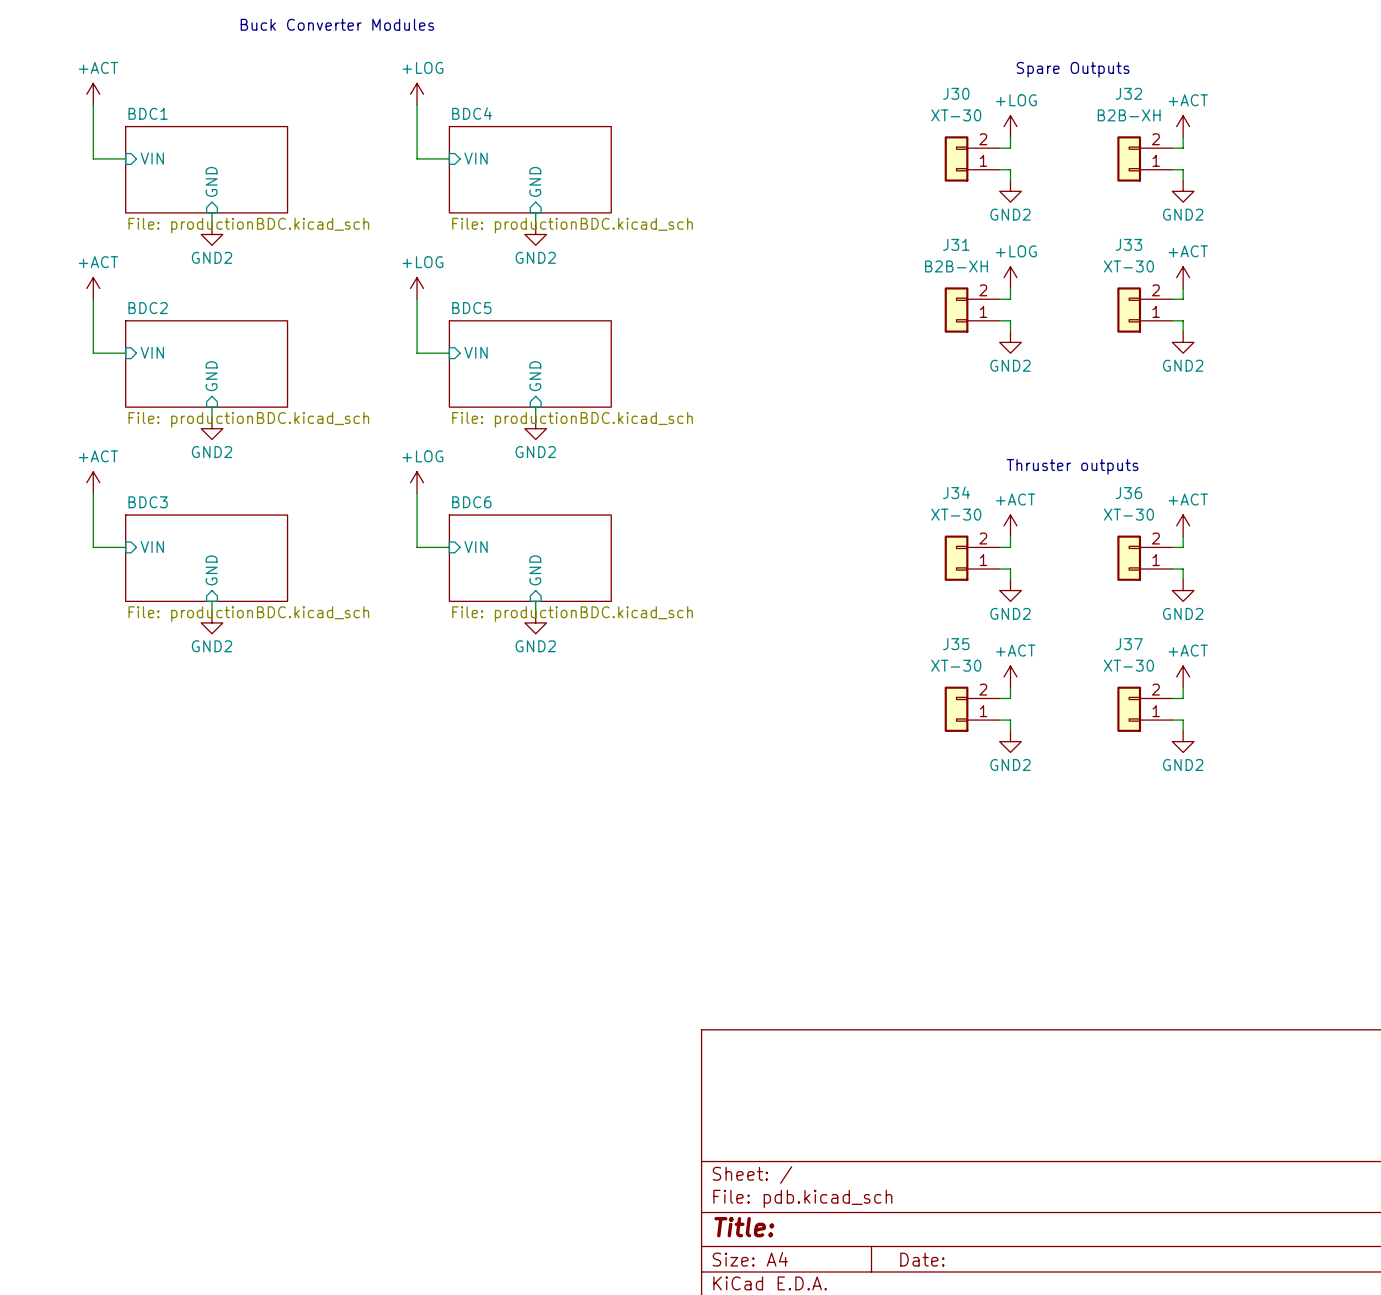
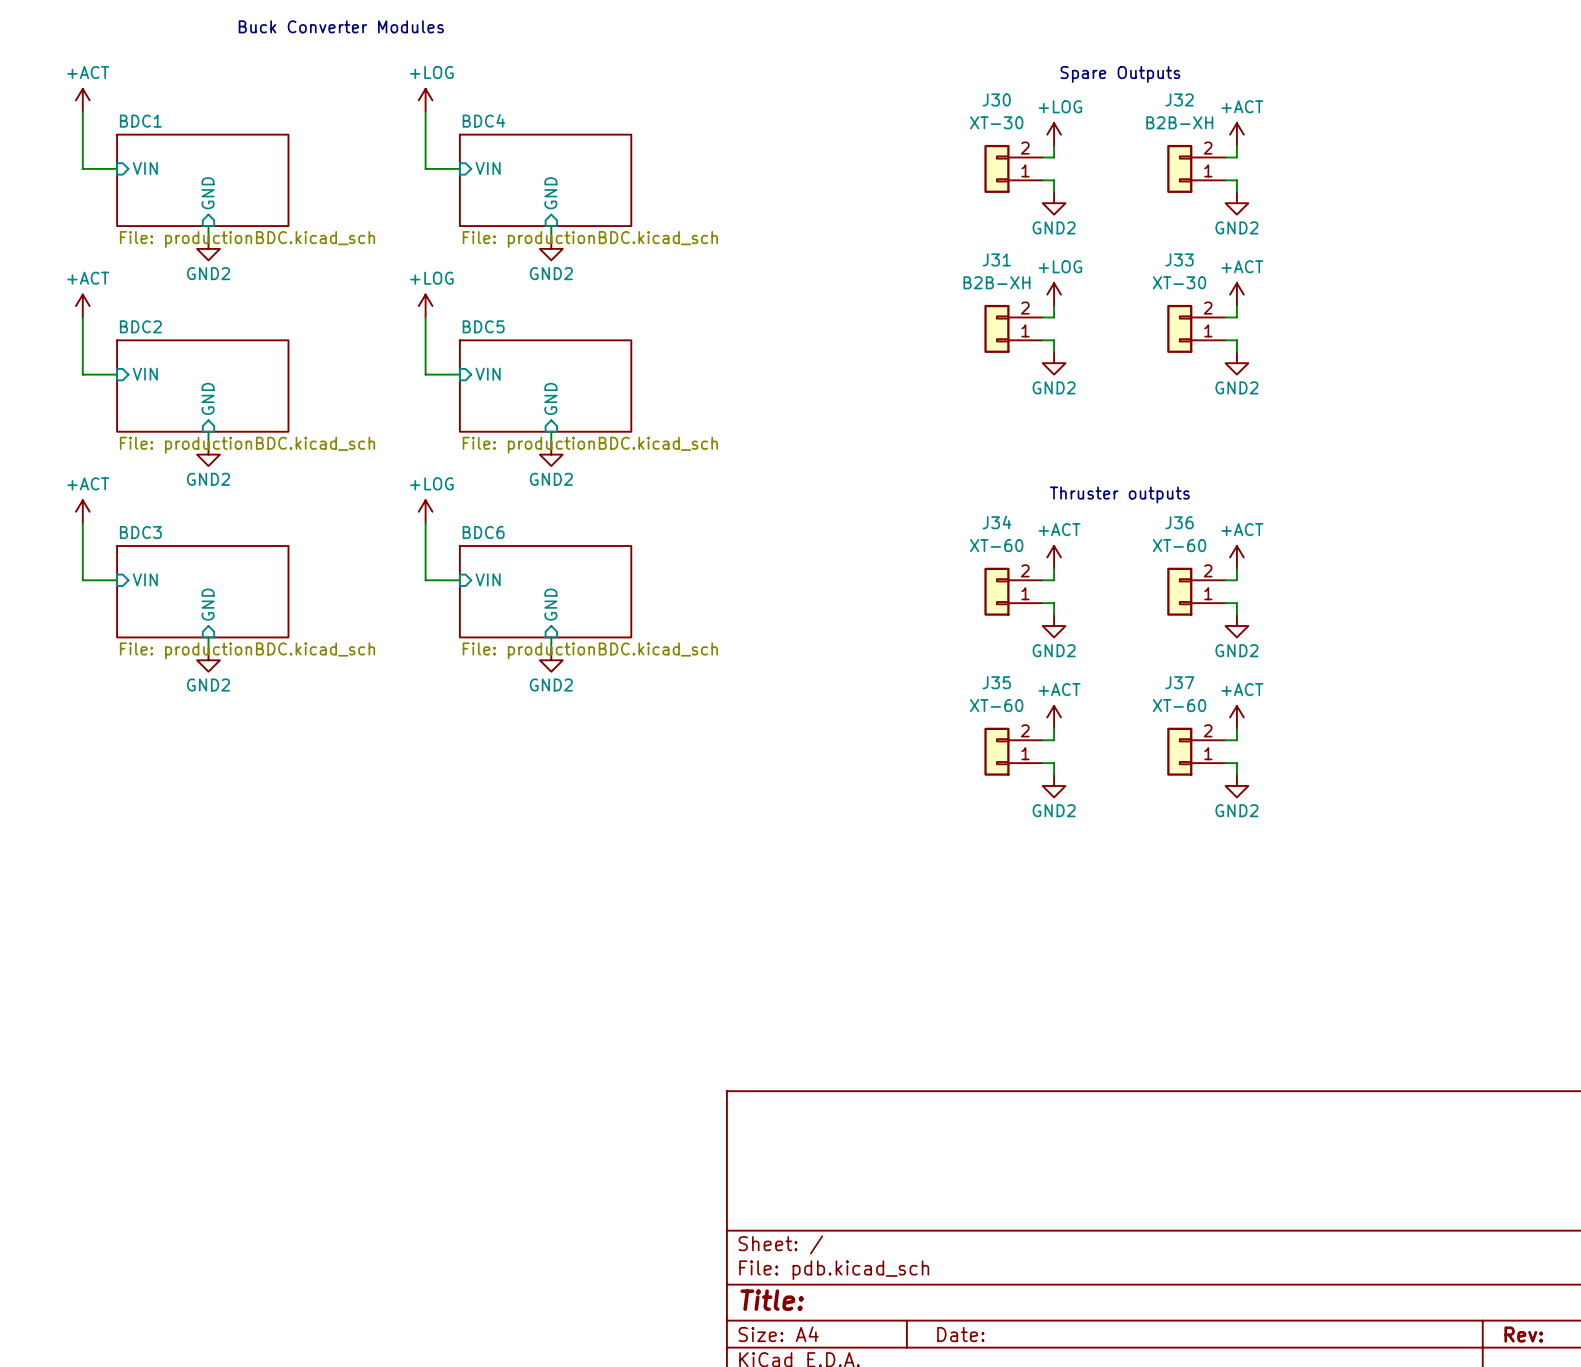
J34 value: XT-30 (956, 514) -> XT-60 (996, 545)
J36 value: XT-30 (1128, 514) -> XT-60 (1179, 545)
J35 value: XT-30 (956, 665) -> XT-60 (996, 705)
J37 value: XT-30 (1128, 665) -> XT-60 (1179, 705)

